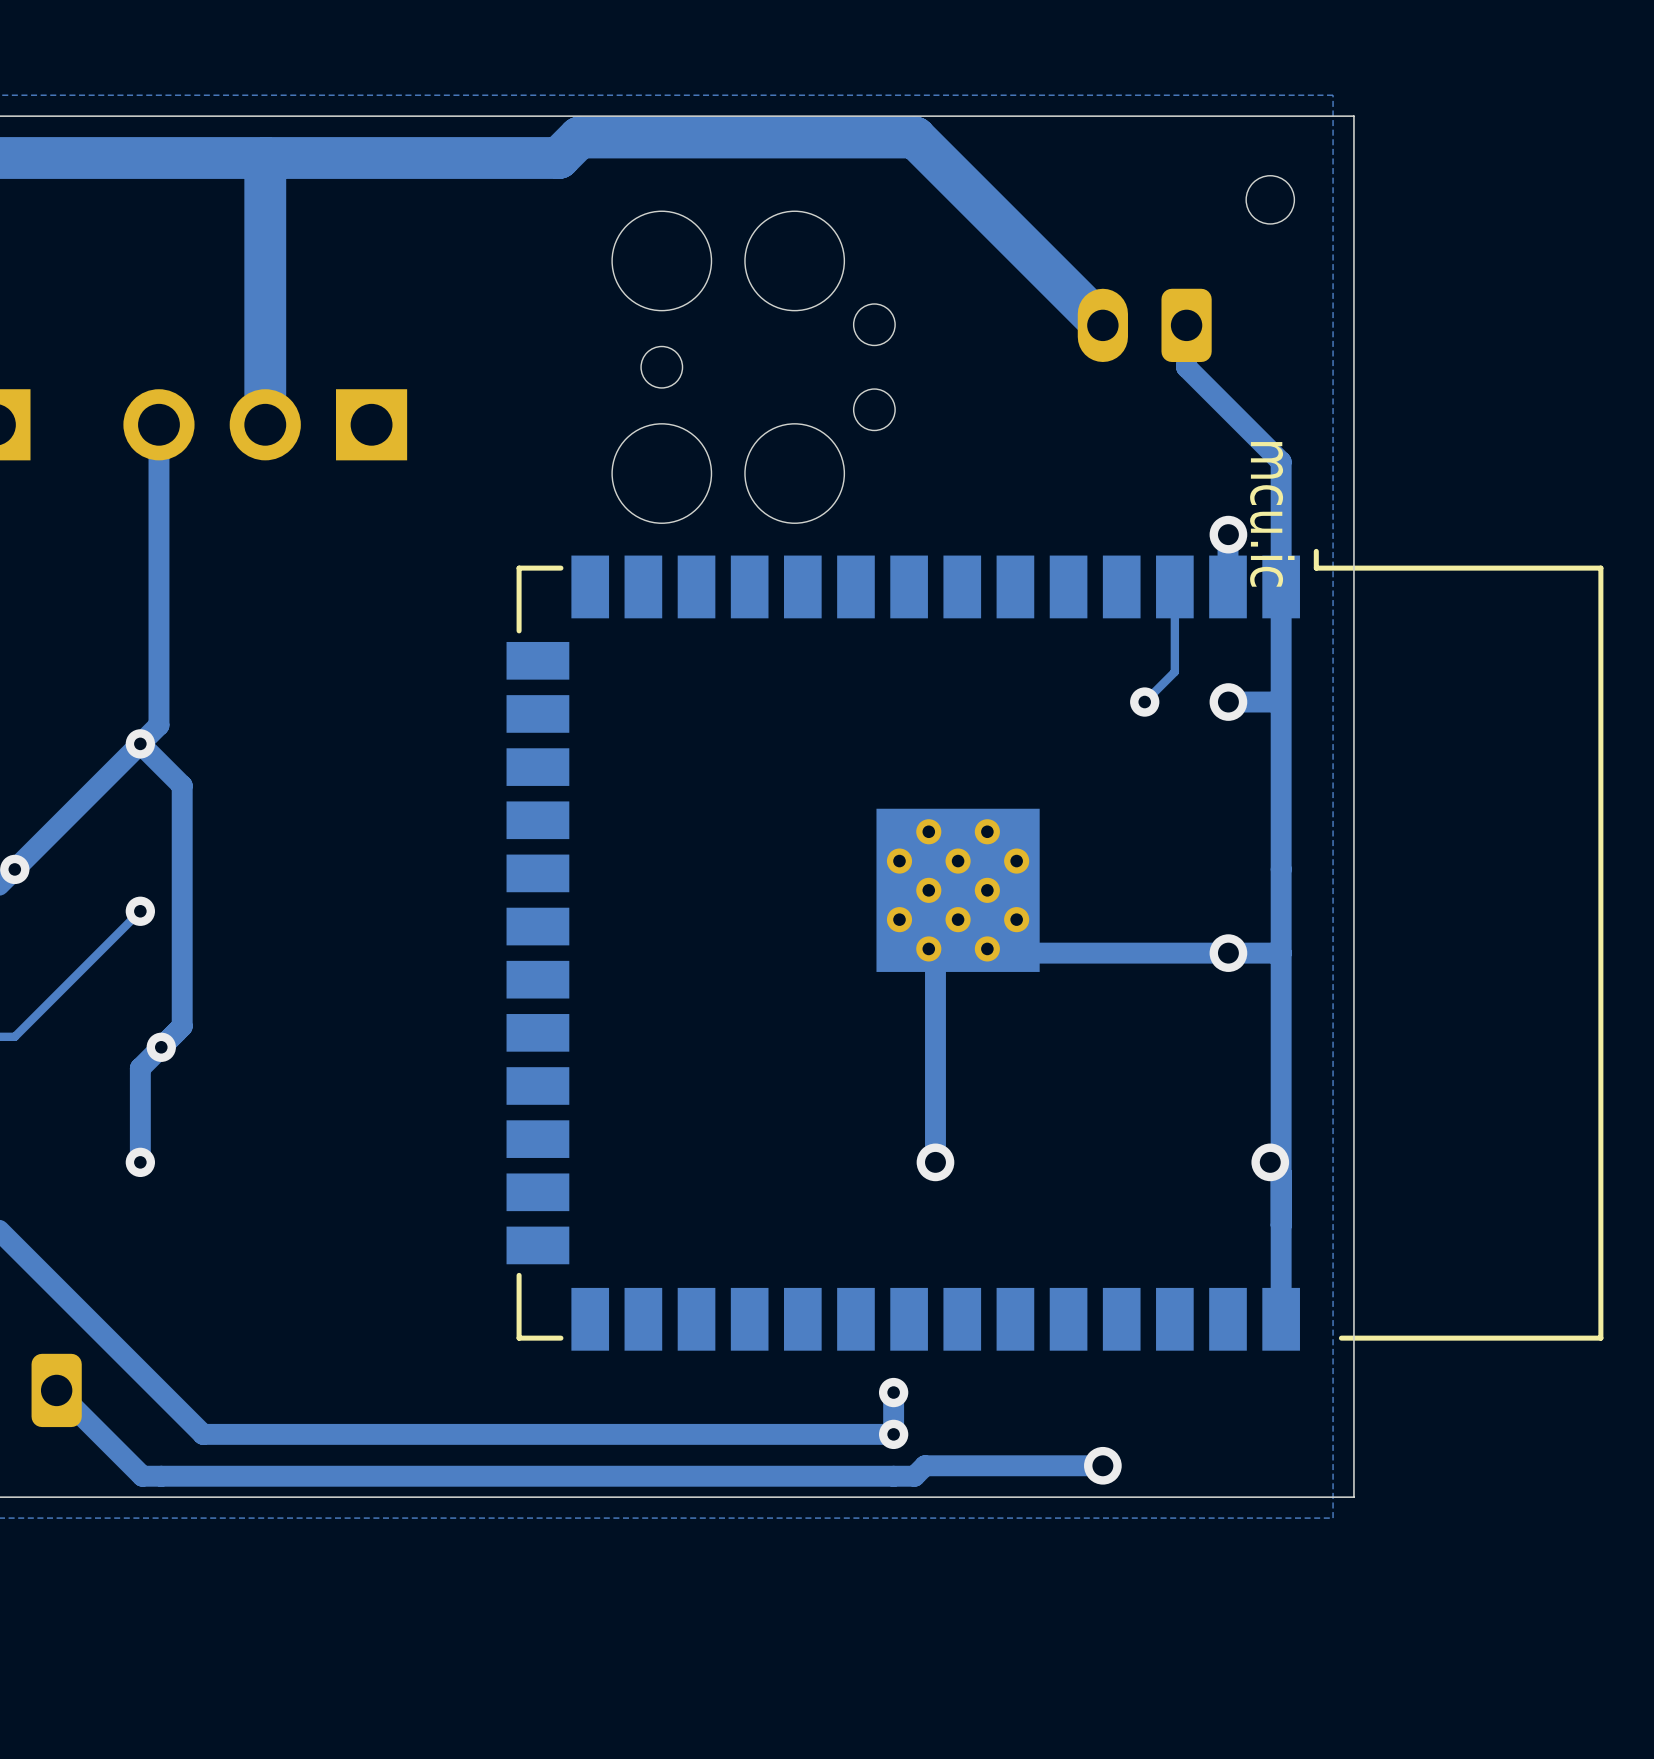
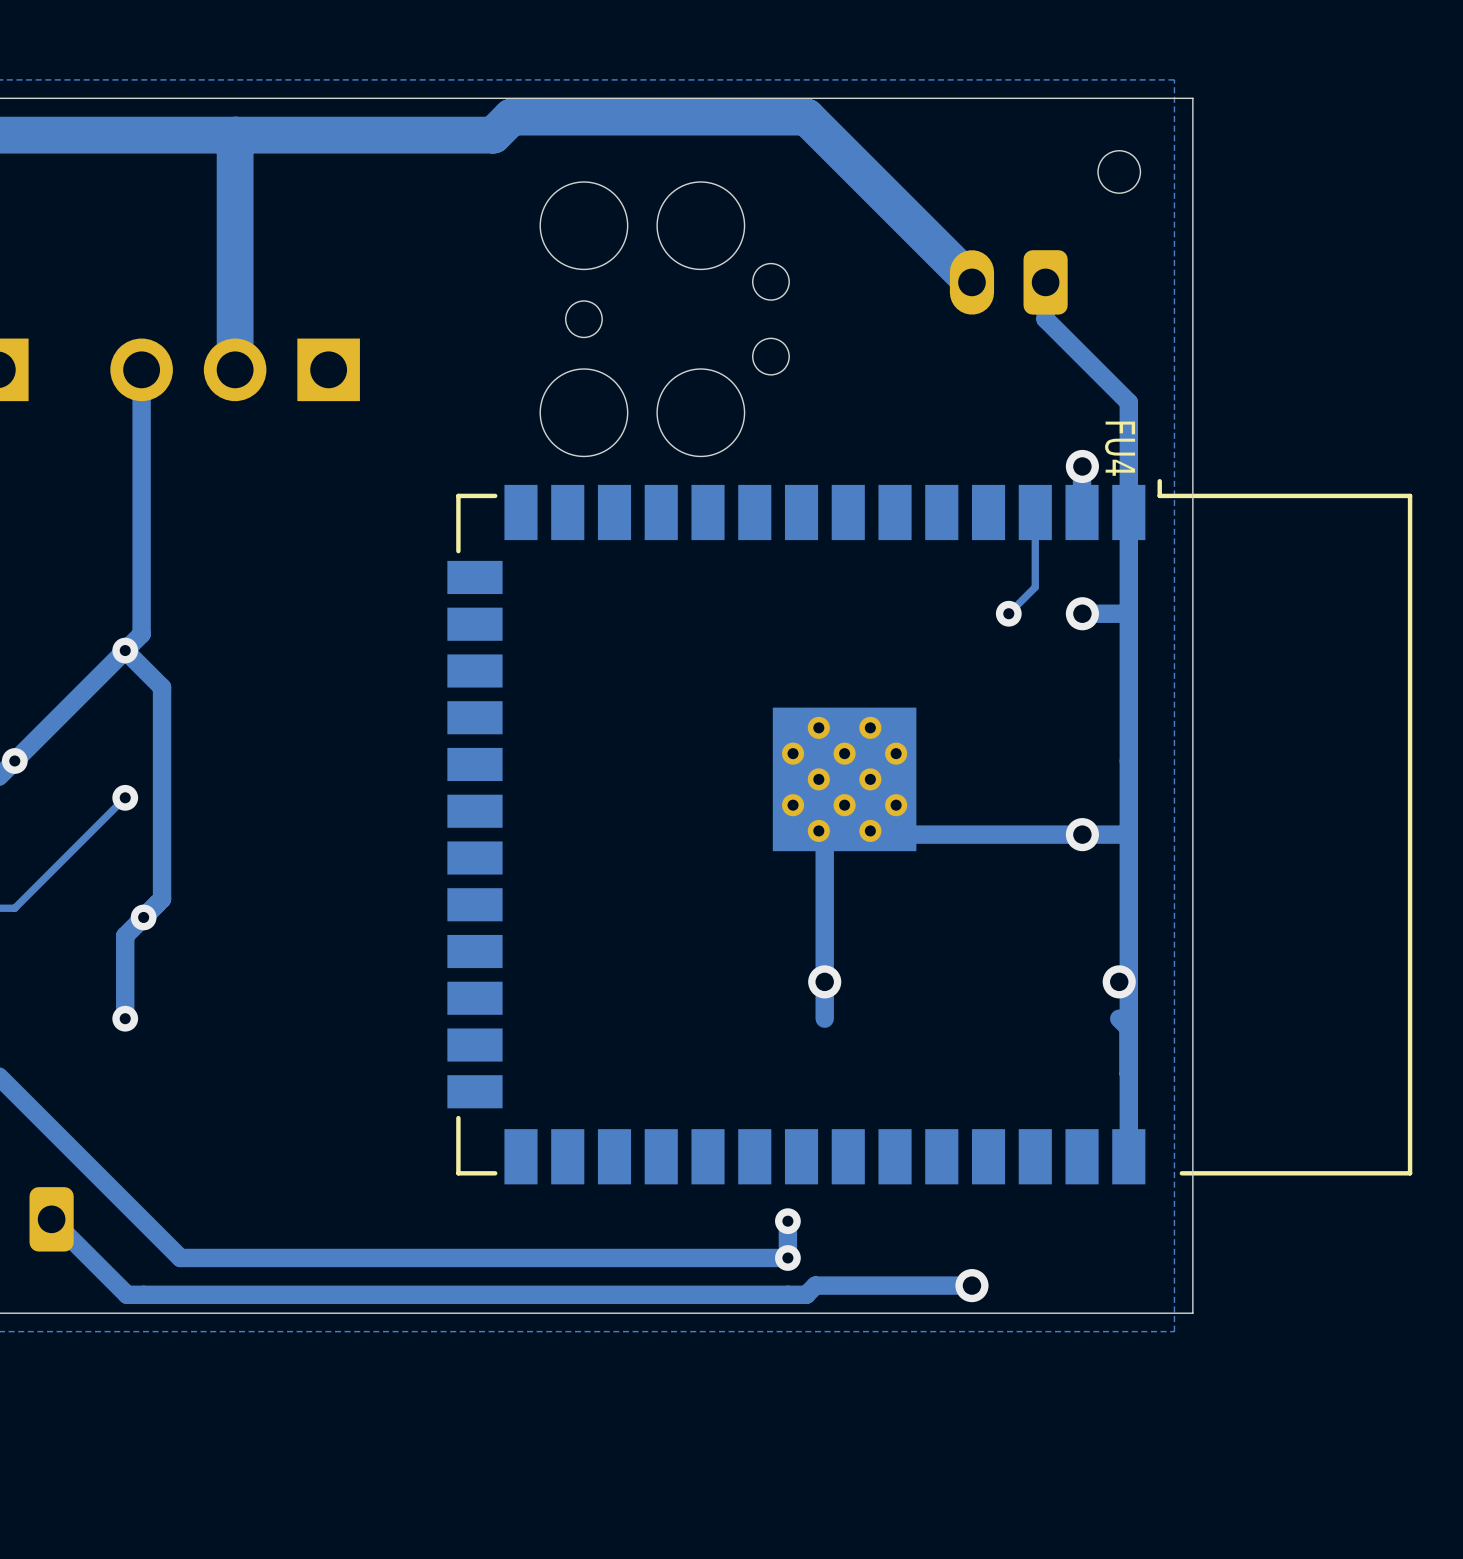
mcu.ic name: mcu.ic (1272, 514) -> FU4 (1120, 448)
via position: (935, 1162) -> (824, 981)
via position: (1270, 1162) -> (1119, 981)

